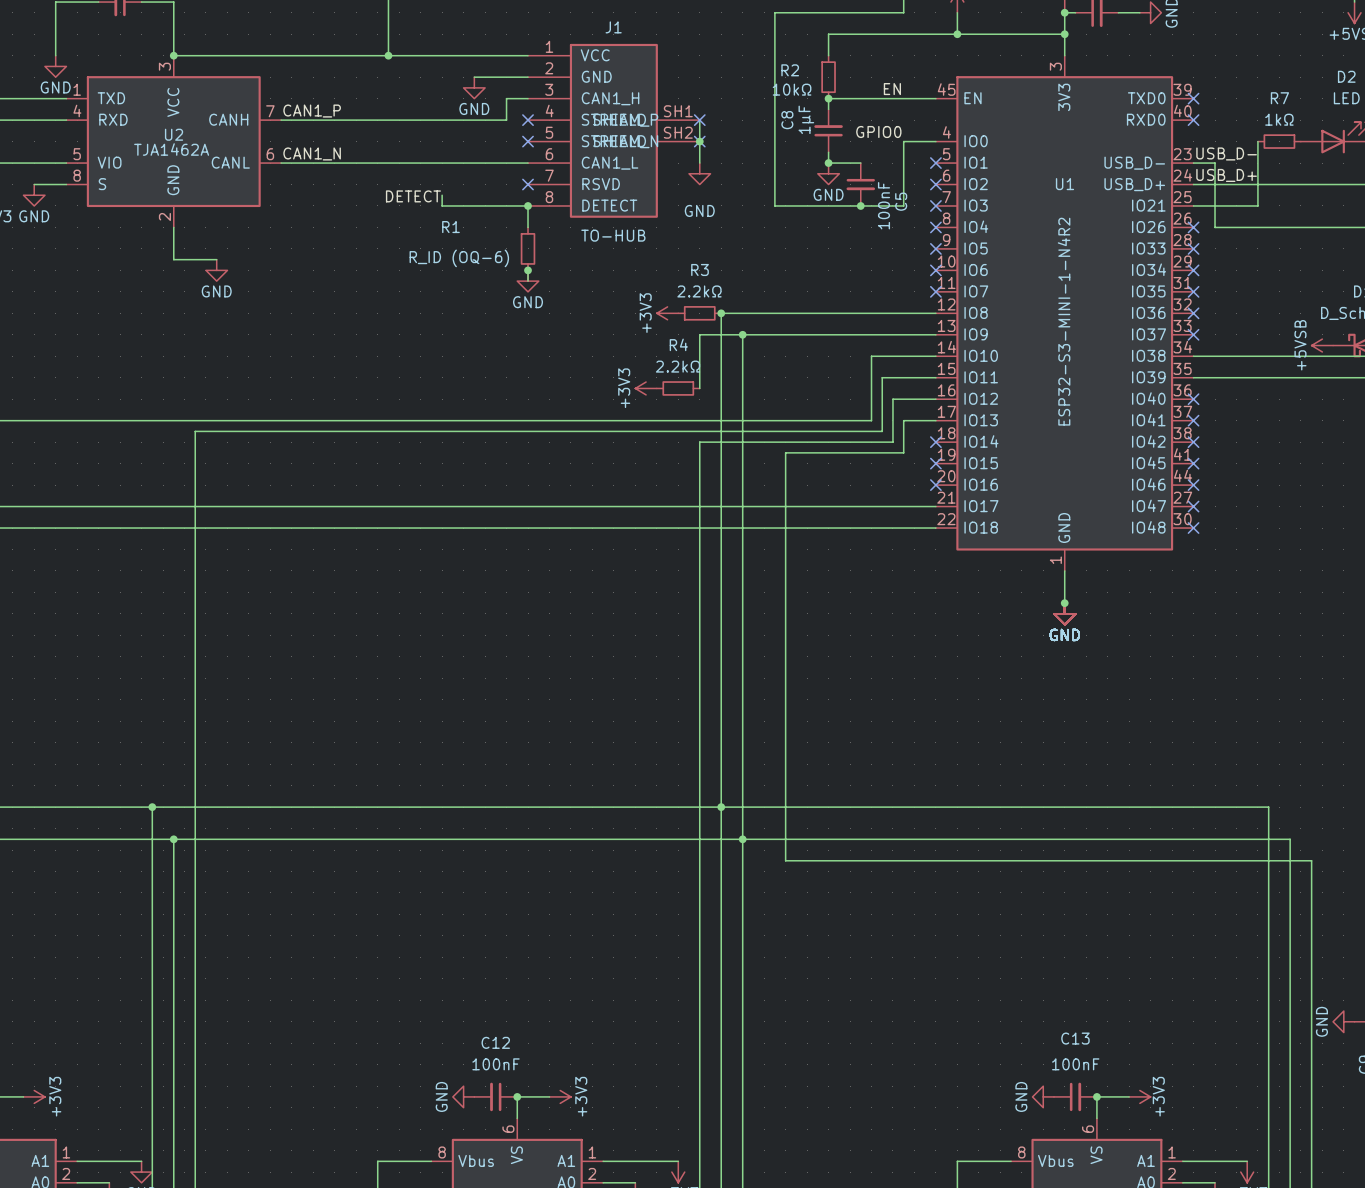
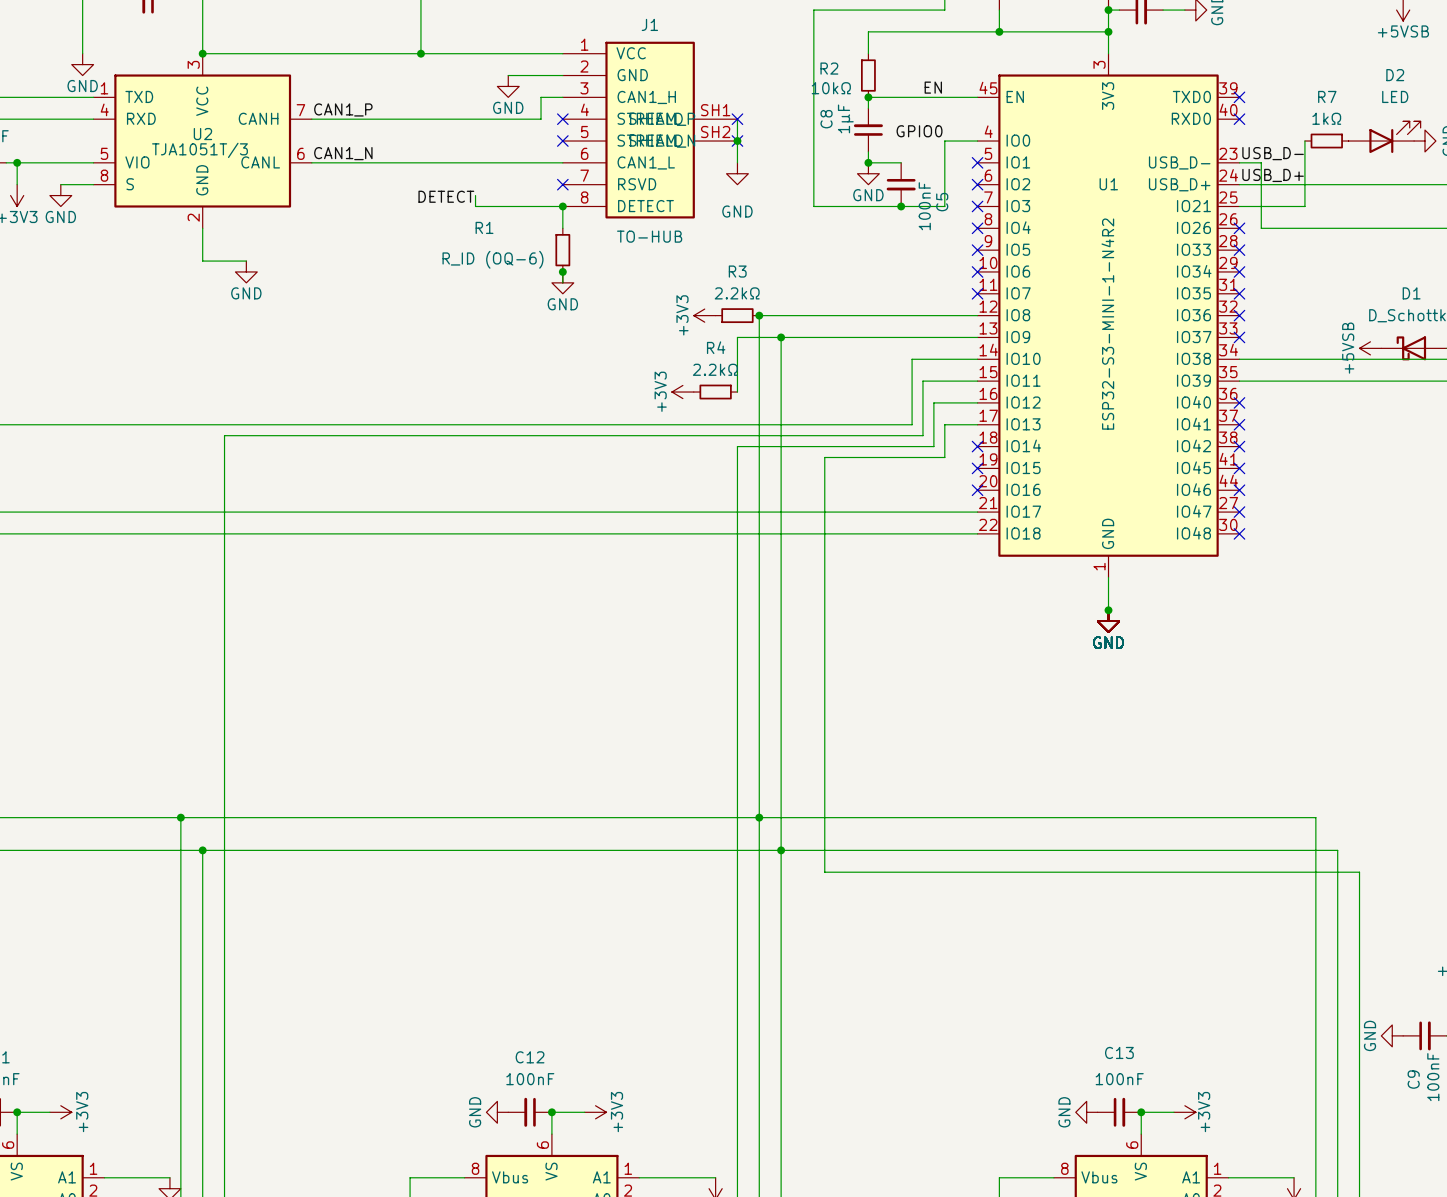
U2 value: TJA1462A (171, 149) -> TJA1051T/3 (199, 150)

